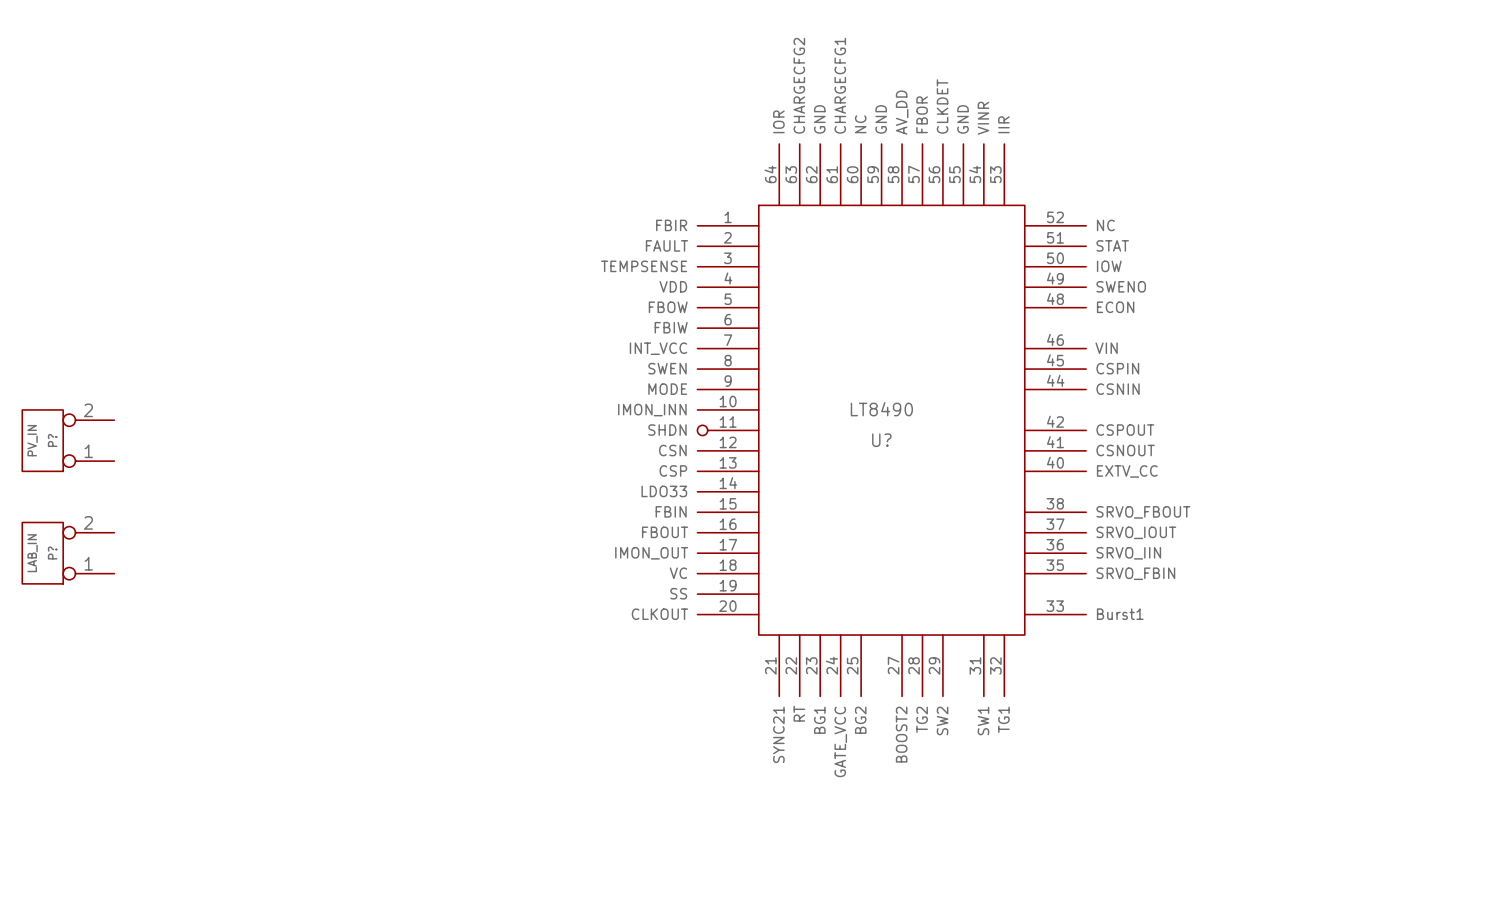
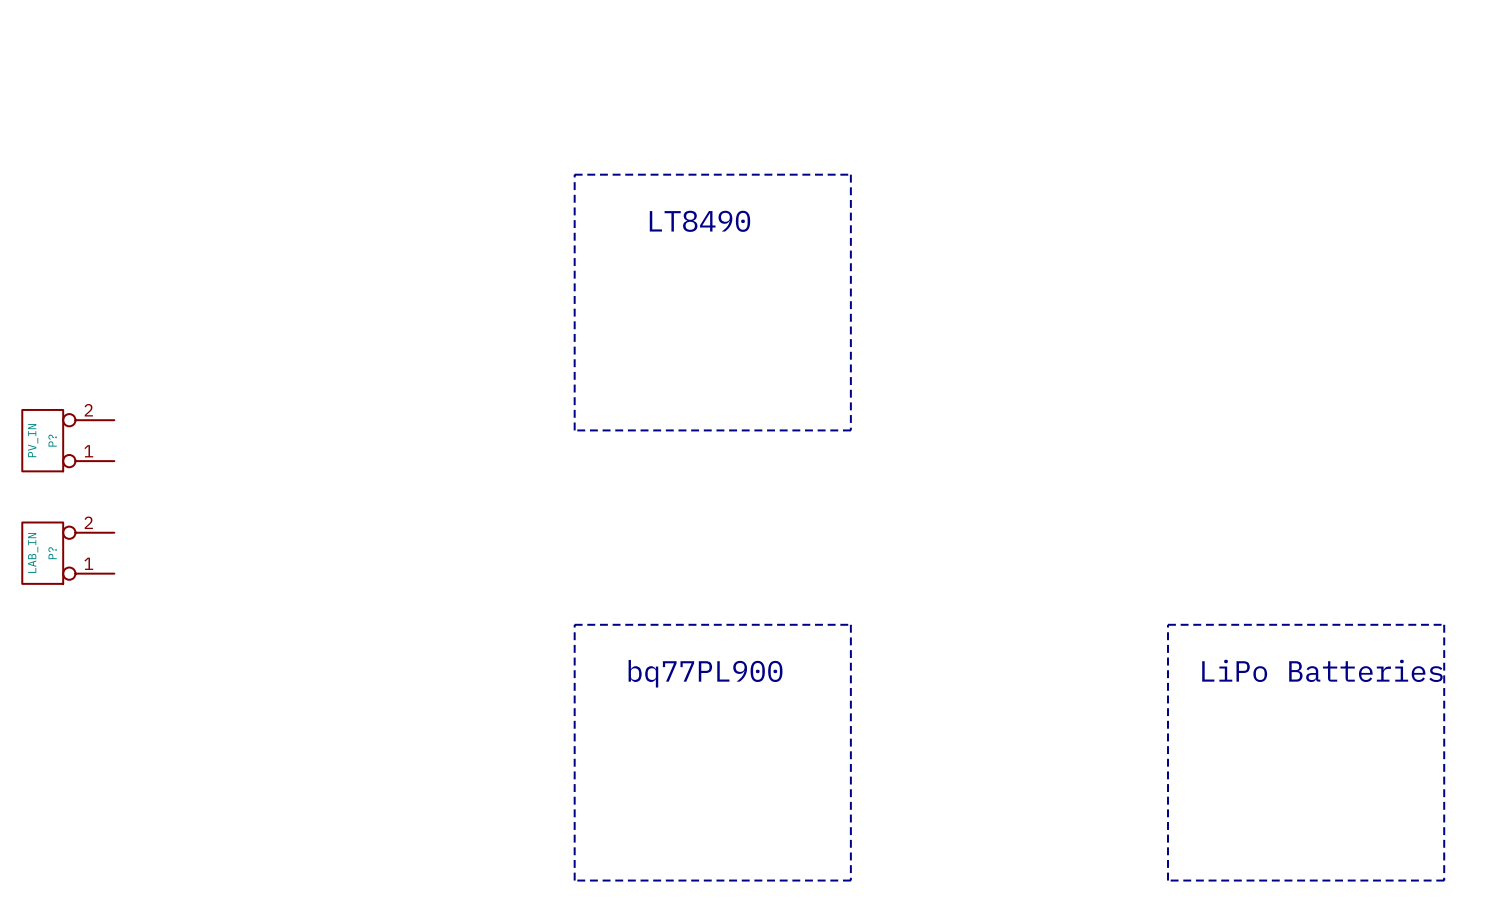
line: none -> (574, 174) (850, 174) (850, 430) (574, 430) (574, 174)
text: none -> LT8490 (699, 221)
U?: LT8490 (891, 420) -> none
line: none -> (574, 624) (574, 880) (850, 880) (850, 624) (574, 624)
line: none -> (1168, 624) (1444, 624) (1444, 880) (1168, 880) (1168, 624)
text: none -> LiPo Batteries (1322, 670)
text: none -> bq77PL900 (705, 673)

